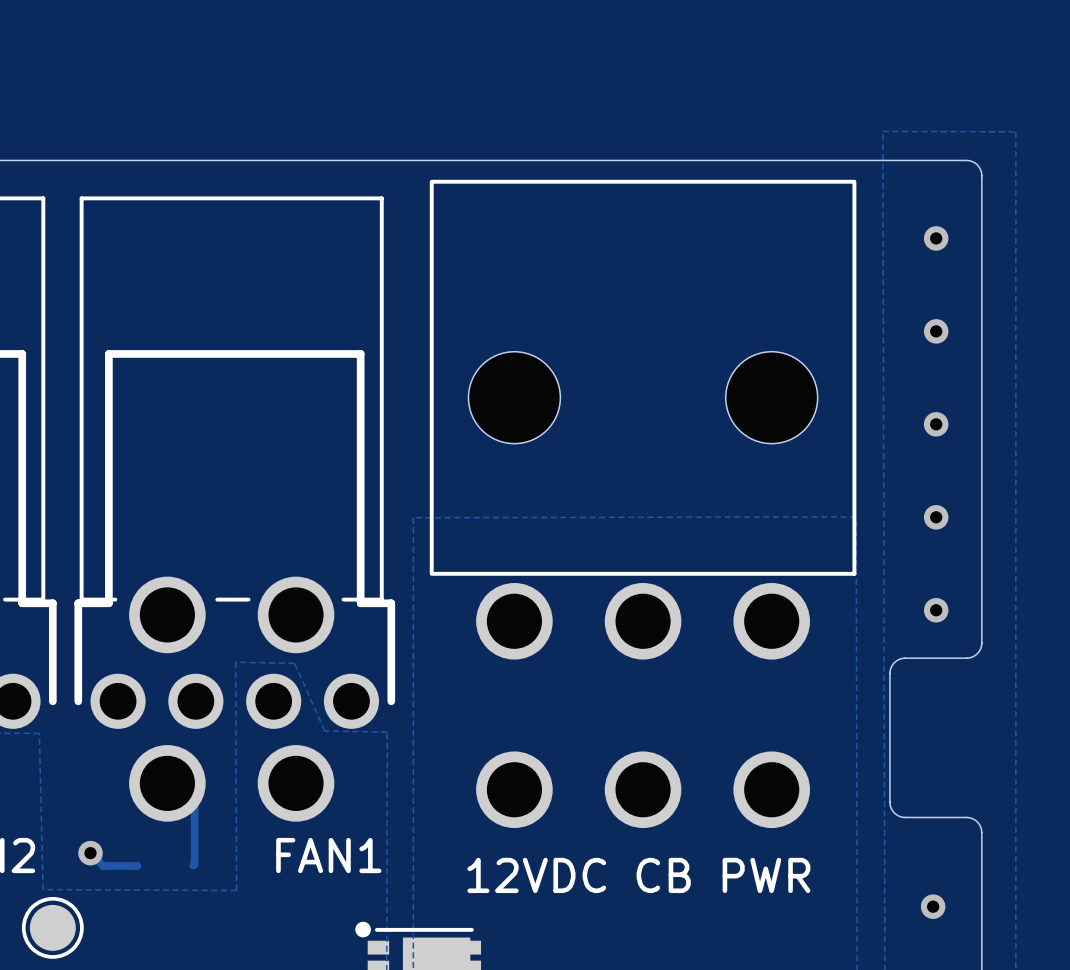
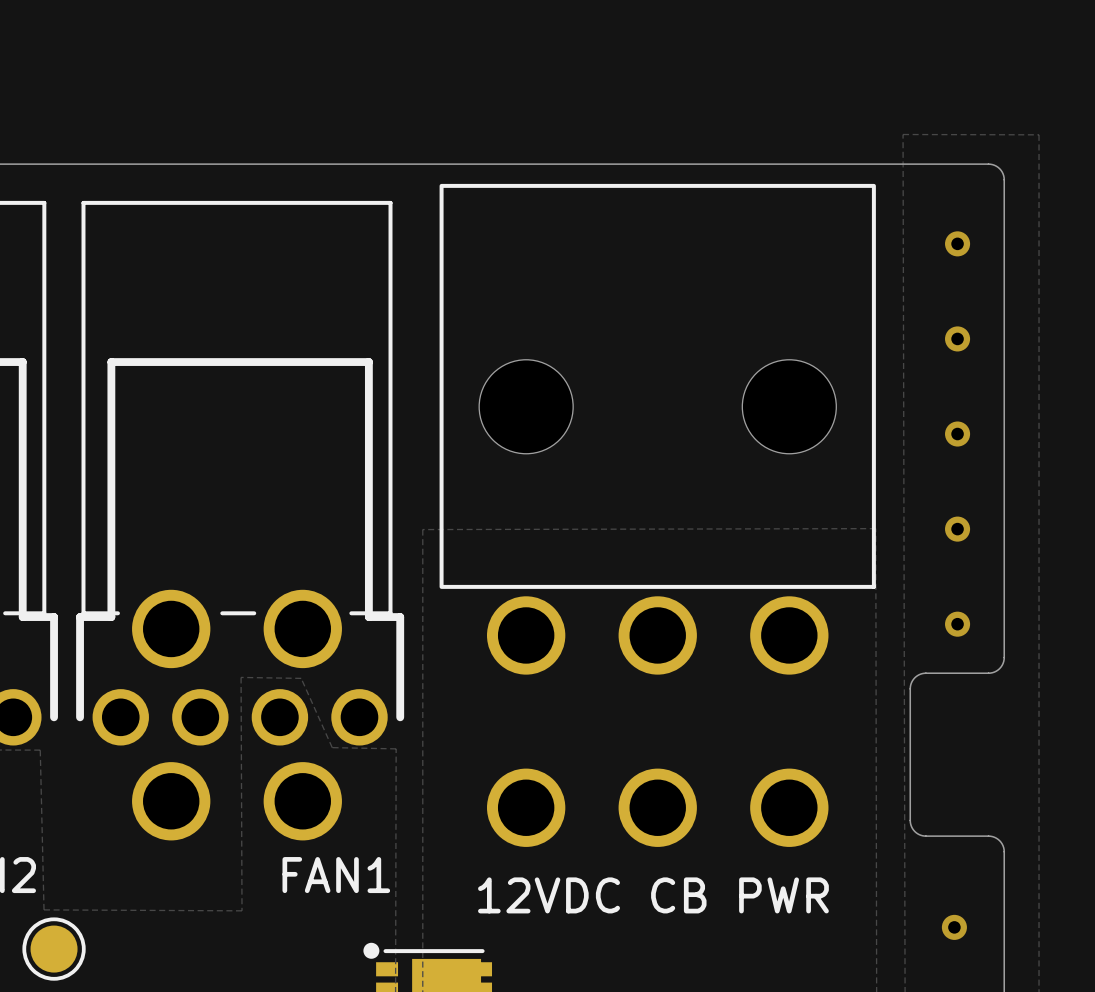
track: (194, 799) (193, 865) -> none
track: (90, 853) (103, 866) (136, 866) -> none
via: (90, 853) -> none

